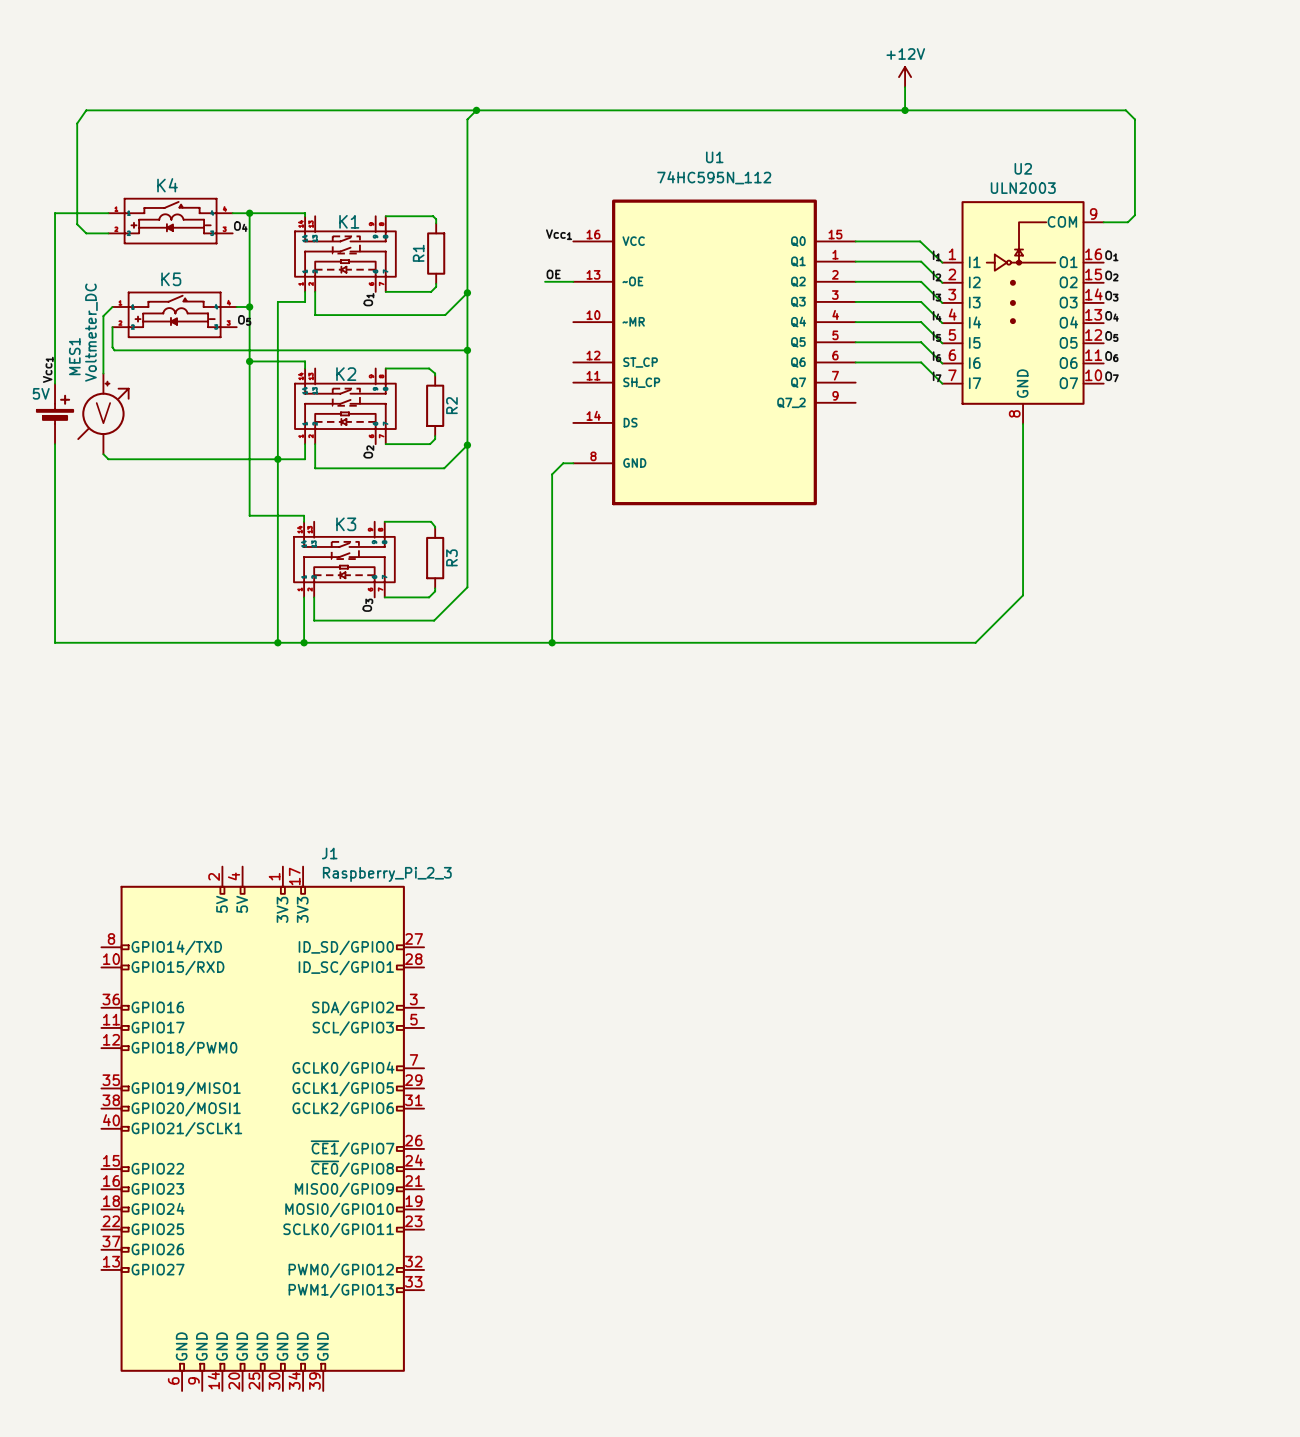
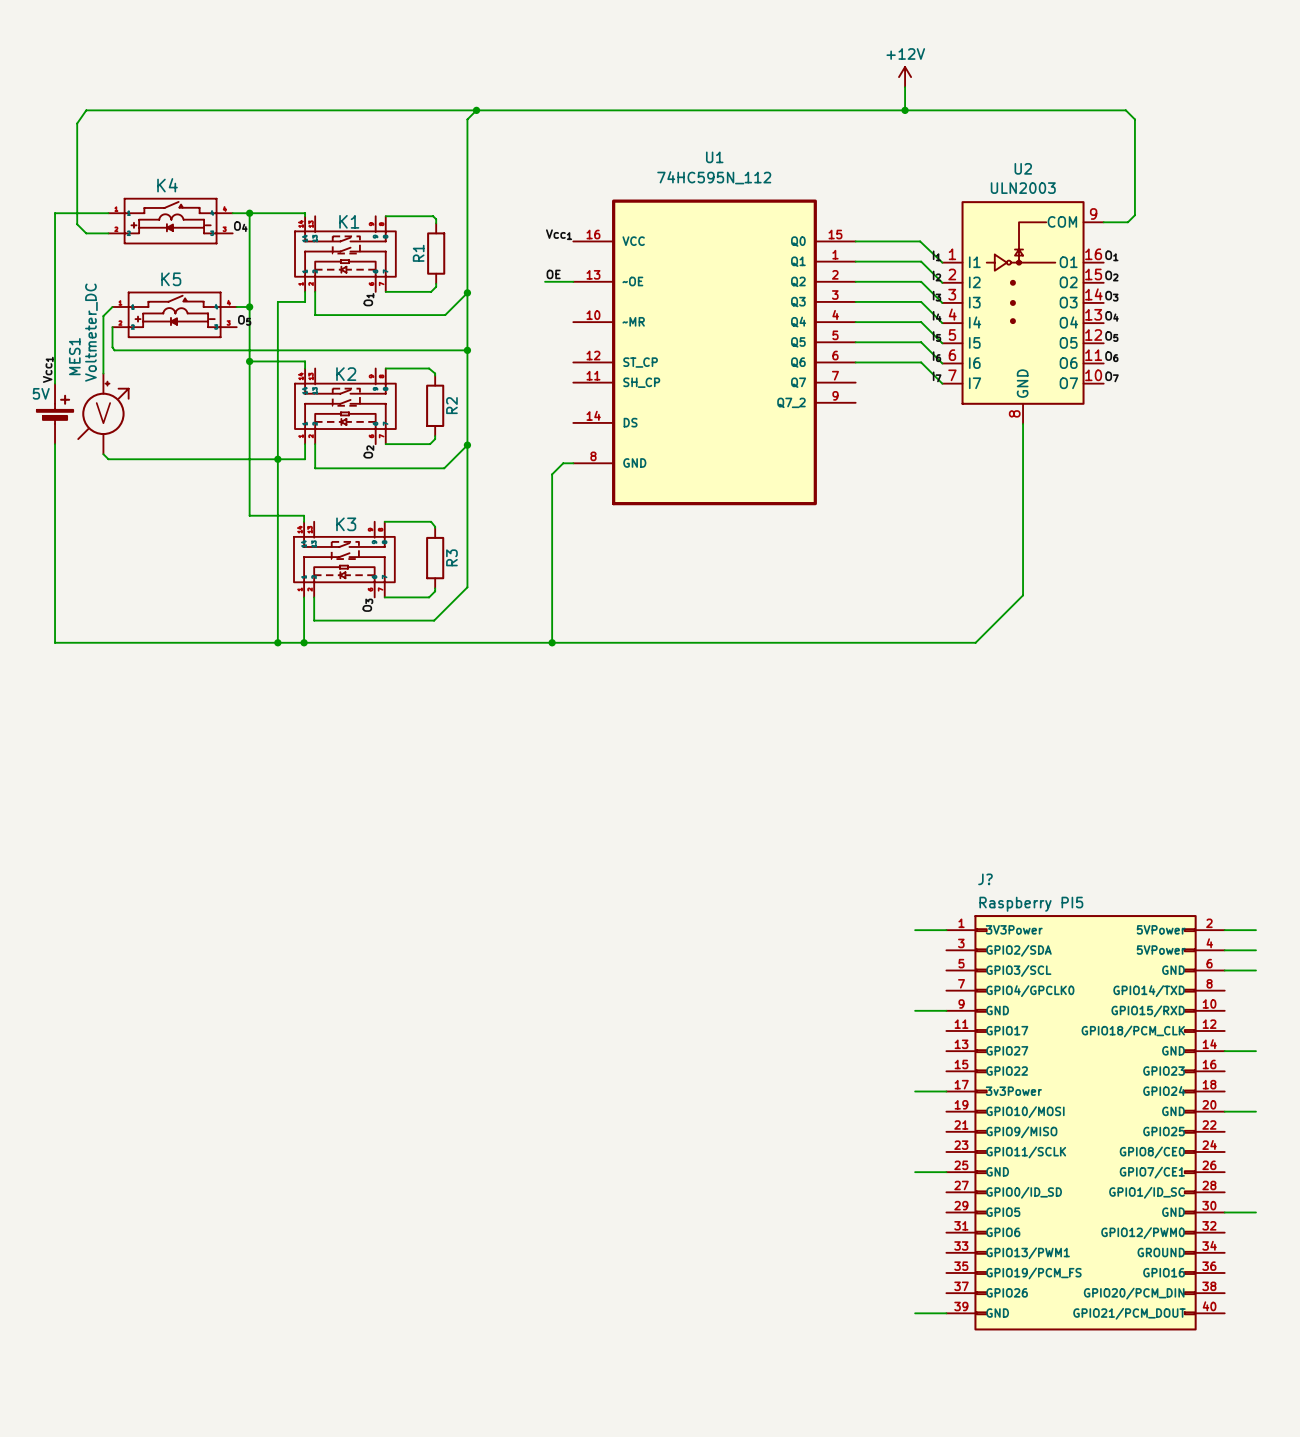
wire: none -> (915, 930) (946, 930)
wire: none -> (1224, 930) (1255, 930)
wire: none -> (1224, 950) (1255, 950)
wire: none -> (1224, 970) (1255, 970)
wire: none -> (915, 1010) (946, 1010)
wire: none -> (1224, 1051) (1255, 1051)
wire: none -> (915, 1091) (946, 1091)
wire: none -> (1224, 1111) (1255, 1111)
J?: none -> Raspberry PI5 (1085, 1122)
J1: Raspberry_Pi_2_3 (262, 1128) -> none
wire: none -> (915, 1172) (946, 1172)
wire: none -> (1224, 1212) (1255, 1212)
wire: none -> (915, 1313) (946, 1313)

